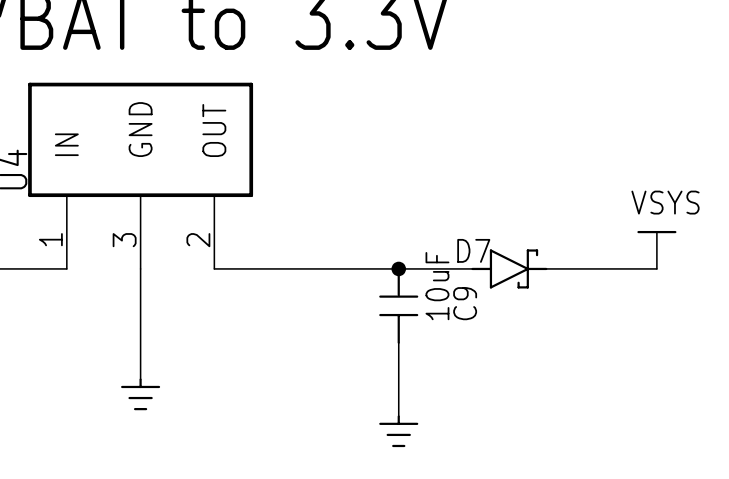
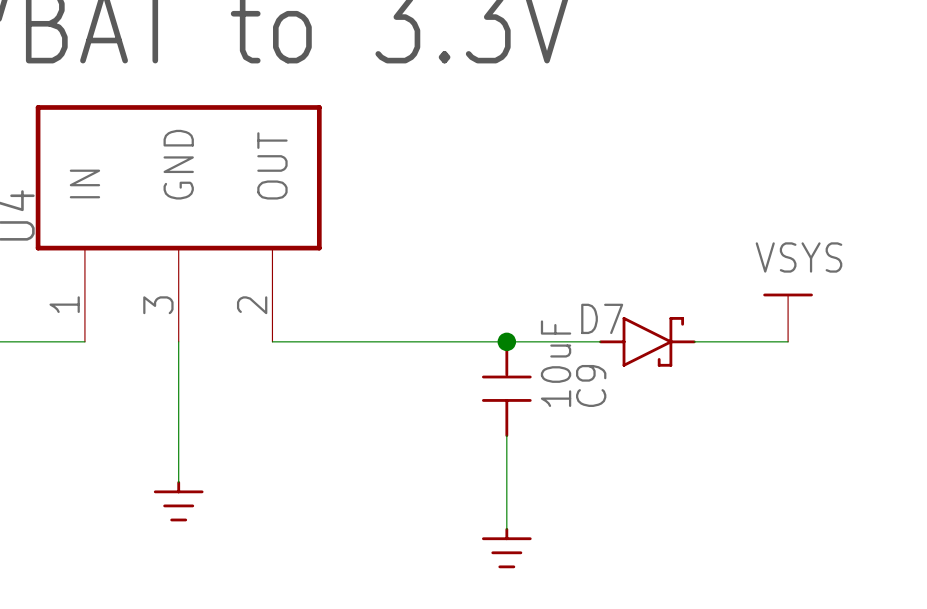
power symbol position: VSYS (656, 249) -> VSYS (788, 317)
wire: (620, 268) (656, 268) -> none

